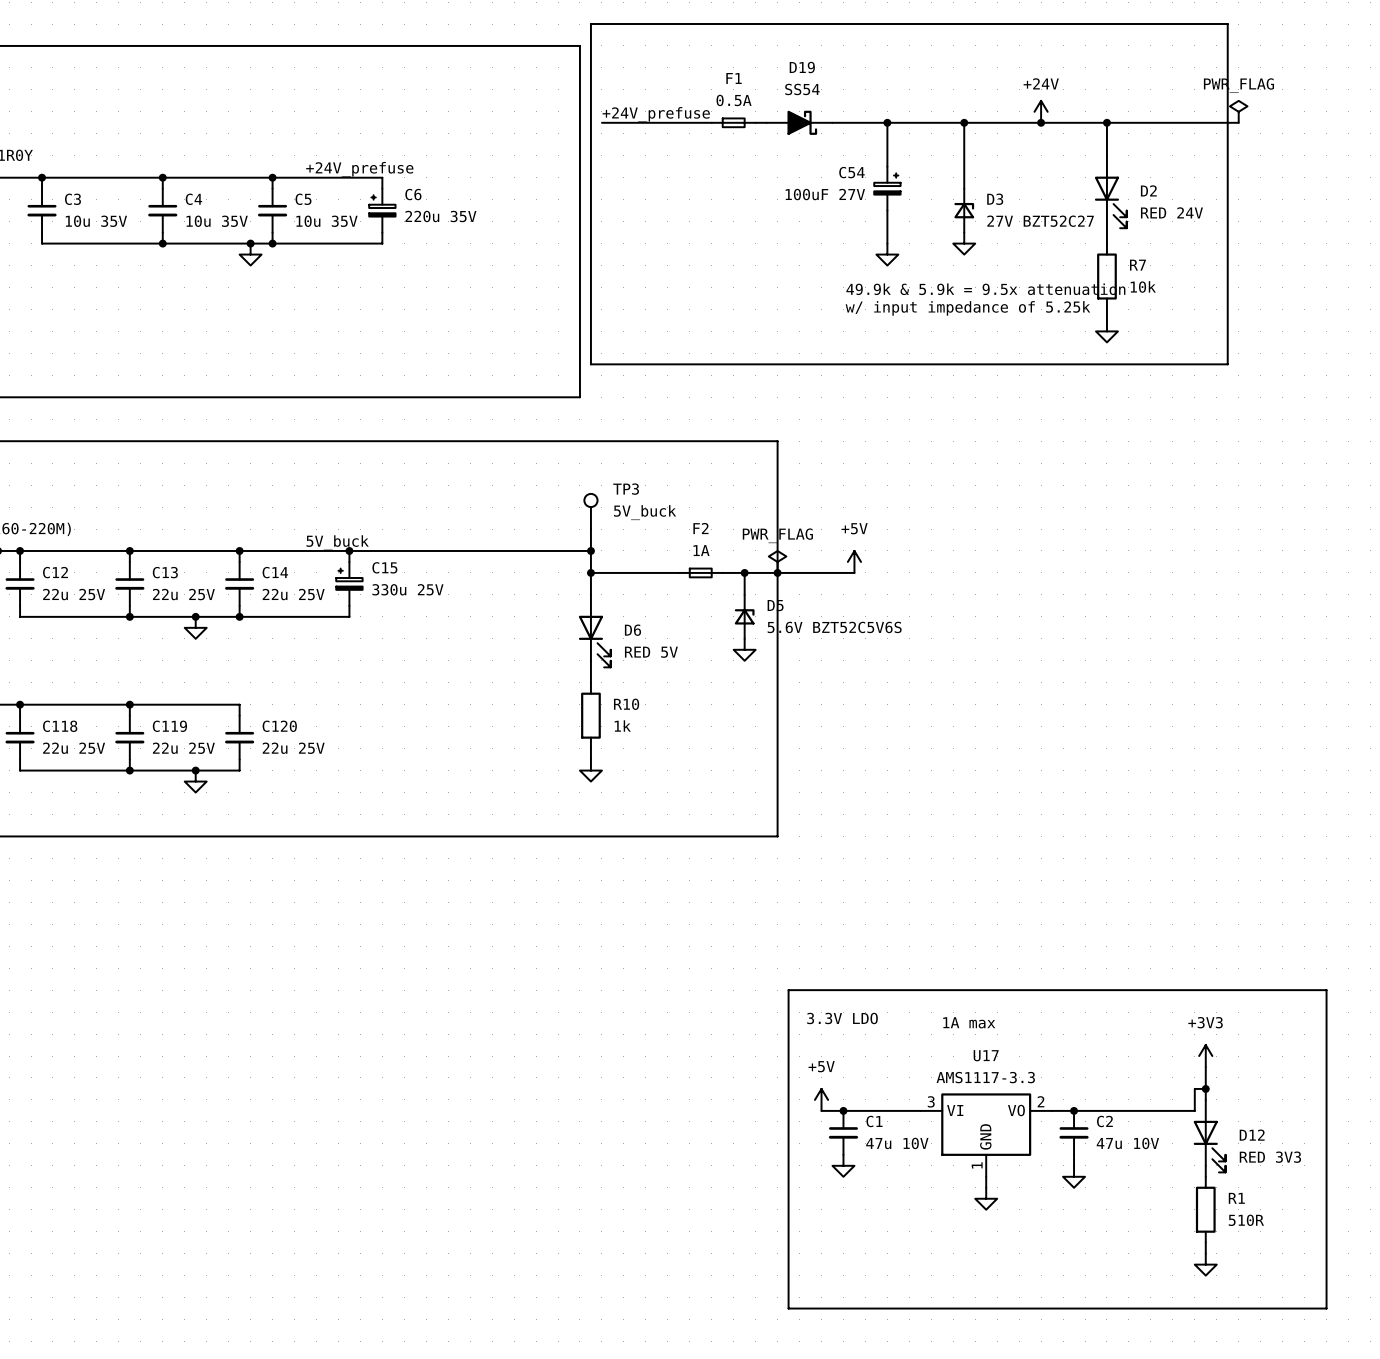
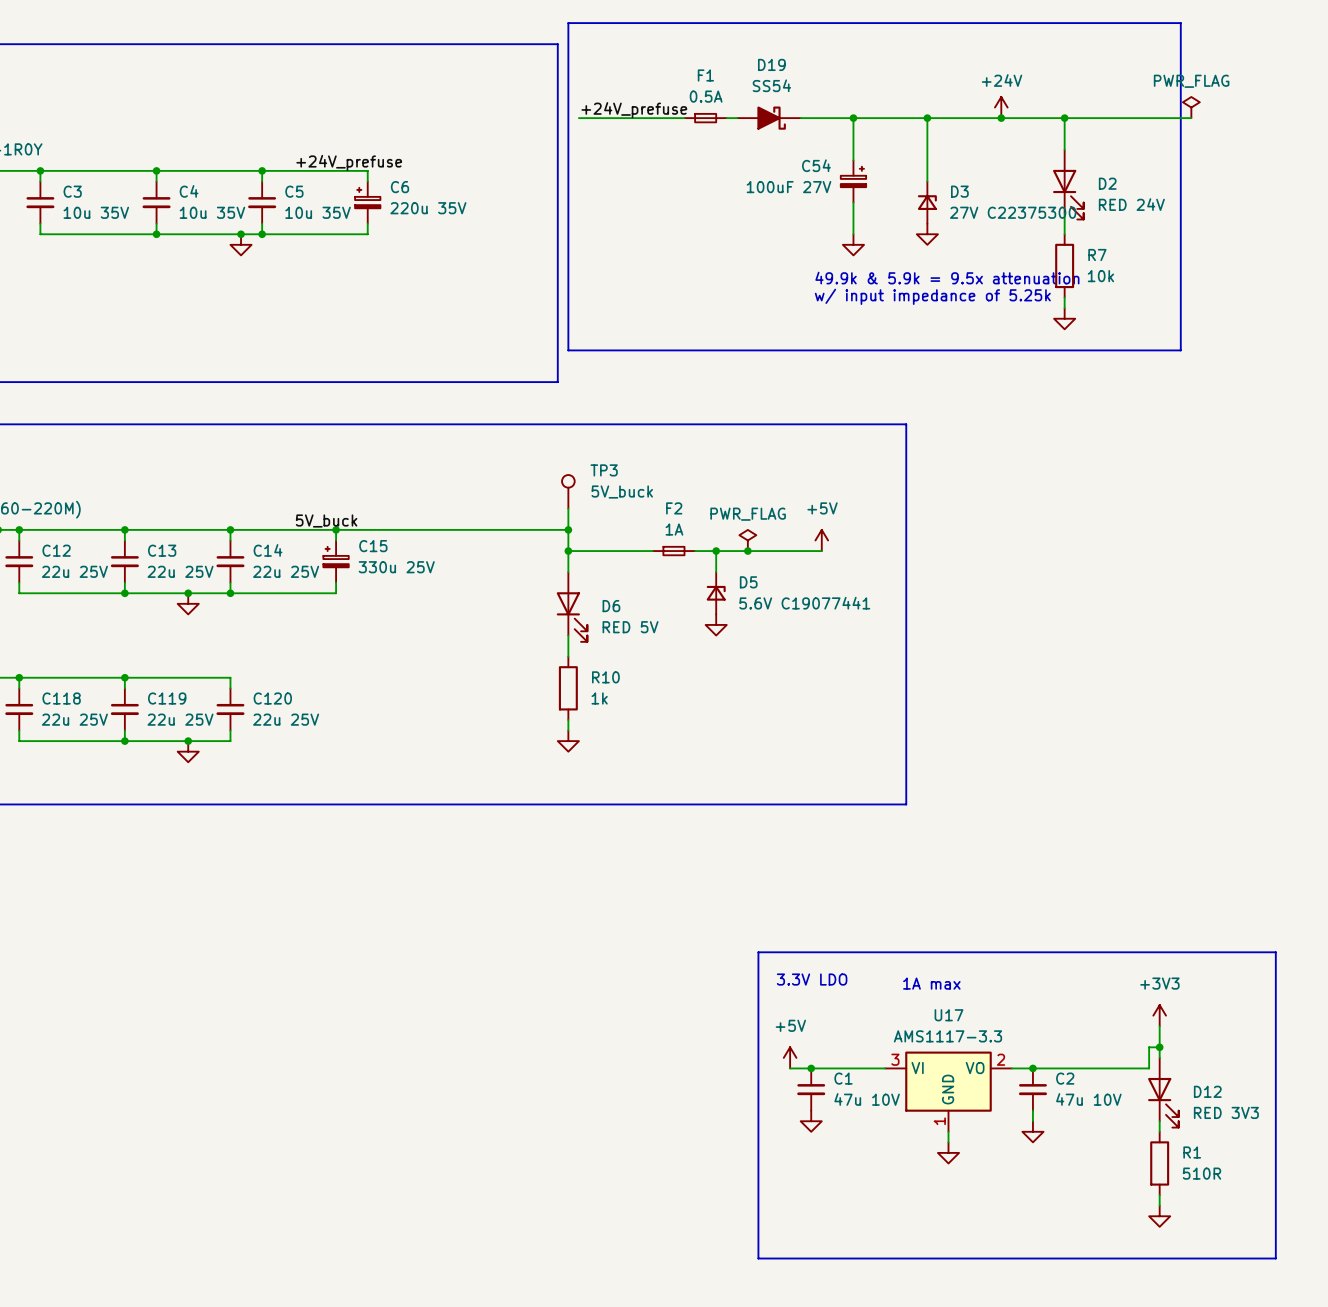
D3 value: 27V BZT52C27 (1040, 221) -> 27V C22375300 (1013, 212)
line: (777, 441) (777, 836) -> (747, 424) (906, 424) (906, 804) (747, 804)
D5 value: 5.6V BZT52C5V6S (834, 627) -> 5.6V C19077441 (804, 603)

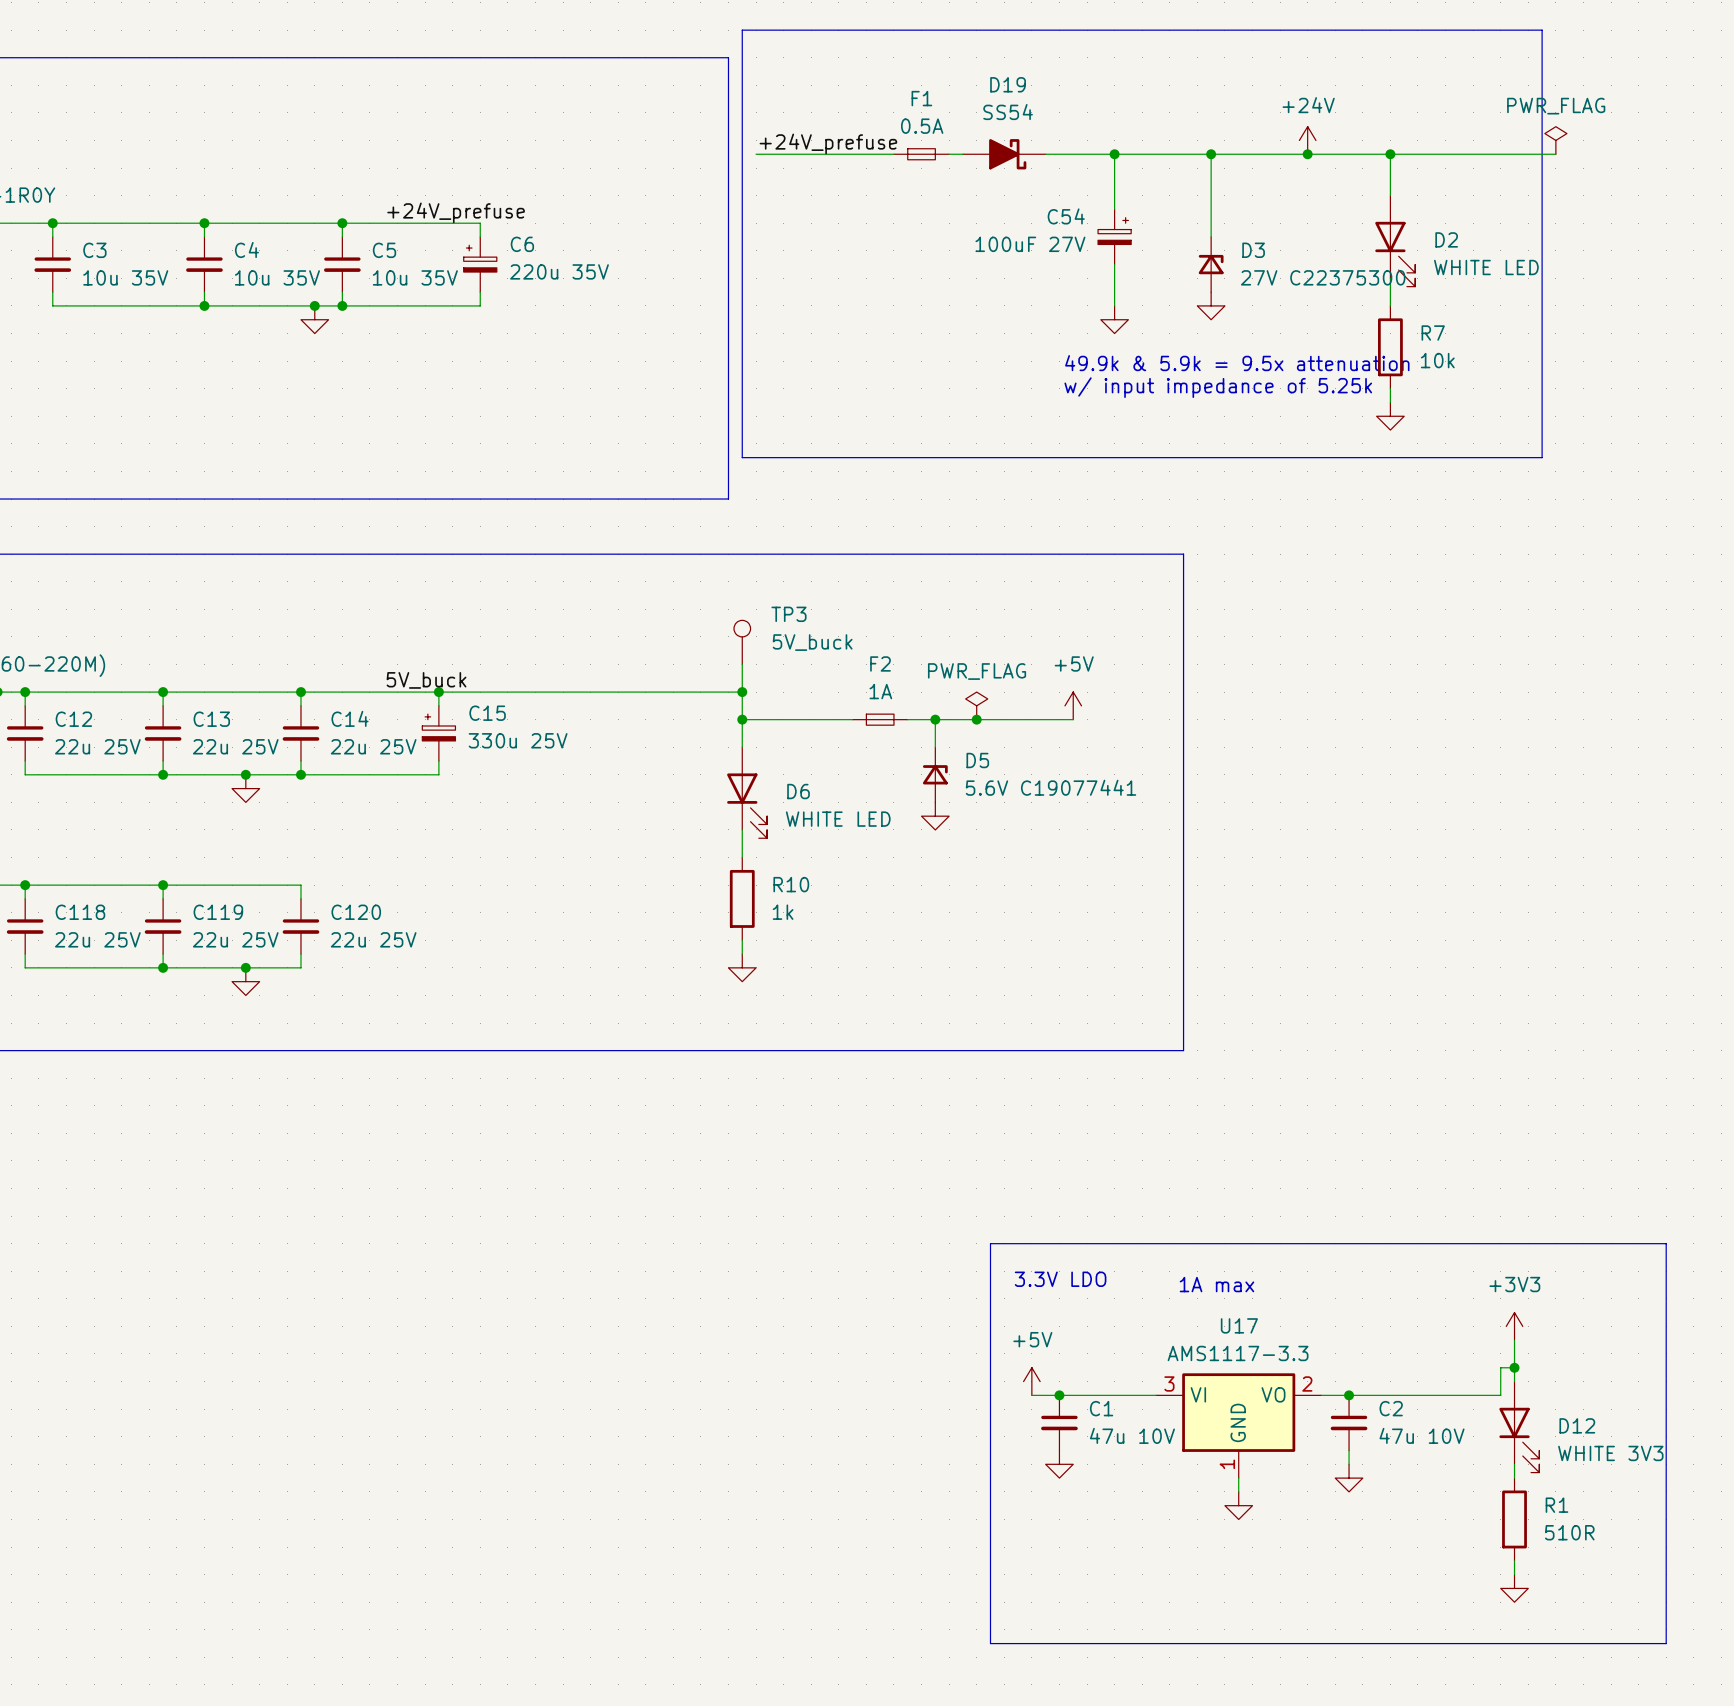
D2 value: RED 24V (1131, 204) -> WHITE LED (1486, 267)
D6 value: RED 5V (630, 627) -> WHITE LED (838, 819)
D12 value: RED 3V3 (1226, 1112) -> WHITE 3V3 (1610, 1453)

